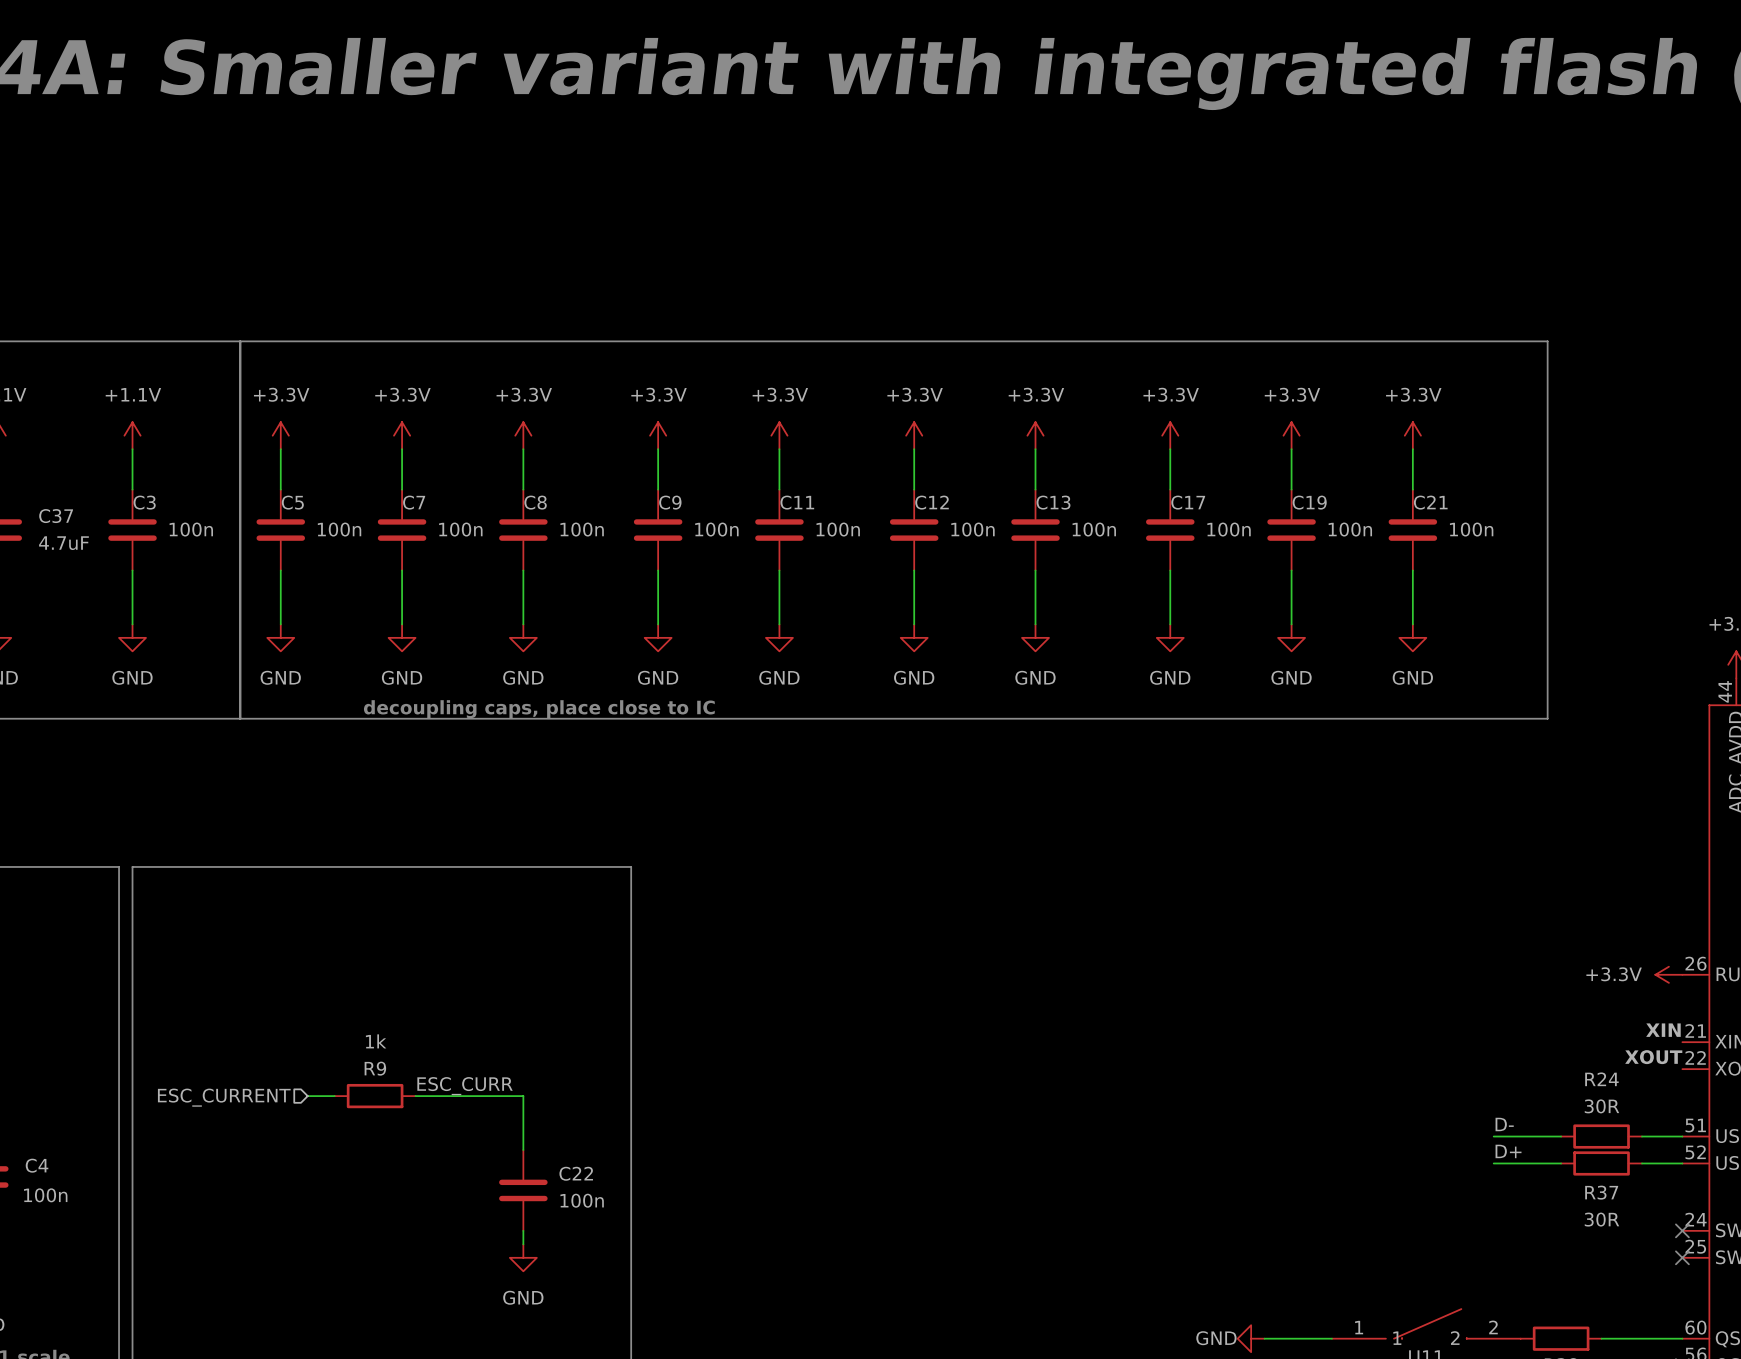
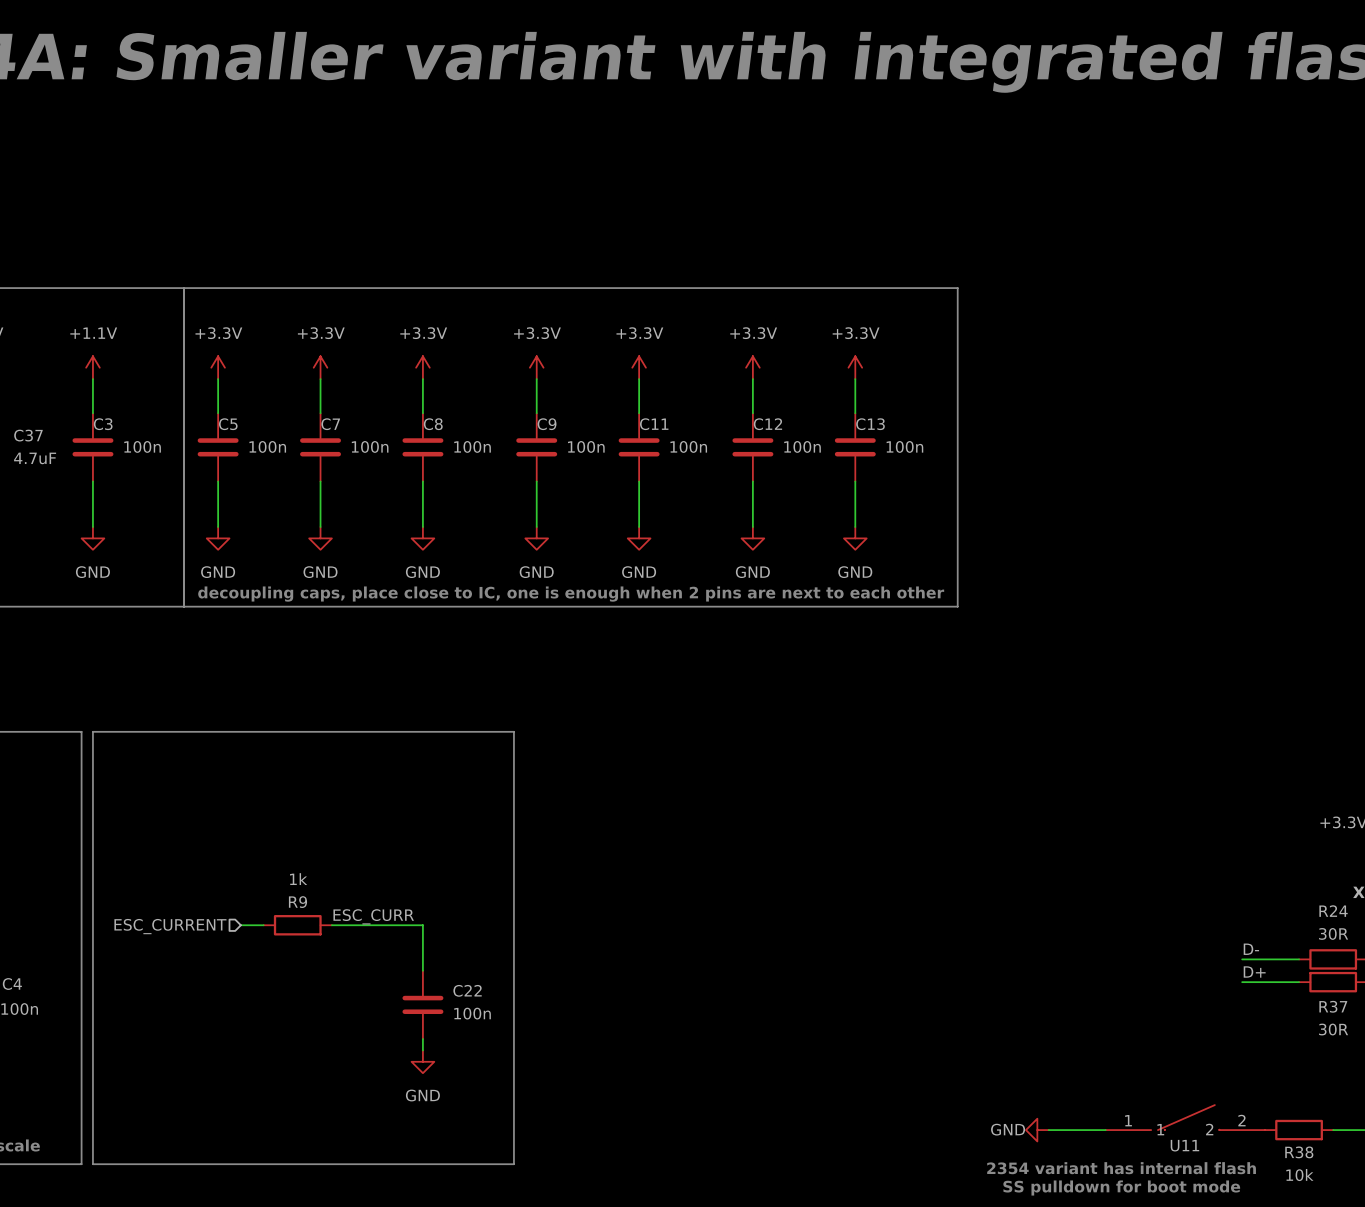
line: (1156, 341) (1547, 341) (1547, 718) (1156, 718) -> (957, 288) (957, 606)
power symbol: +3.3V (1170, 435) -> none
power symbol: +3.3V (1291, 435) -> none
power symbol: +3.3V (1412, 435) -> none
wire: (1170, 449) (1170, 489) -> none
wire: (1291, 449) (1291, 489) -> none
wire: (1412, 449) (1412, 489) -> none
C17: 100n (1170, 530) -> none
C19: 100n (1291, 530) -> none
C21: 100n (1412, 530) -> none
wire: (1170, 570) (1170, 624) -> none
wire: (1291, 570) (1291, 624) -> none
wire: (1412, 570) (1412, 624) -> none
power symbol: GND (1170, 637) -> none
power symbol: GND (1291, 637) -> none
power symbol: GND (1412, 637) -> none
text: none -> decoupling caps, place close to IC, one is enough when 2 pins are next to each other (571, 594)
text: decoupling caps, place close to IC (539, 709) -> none

